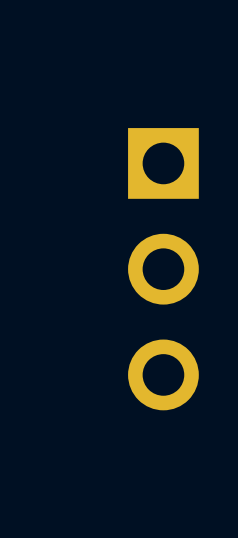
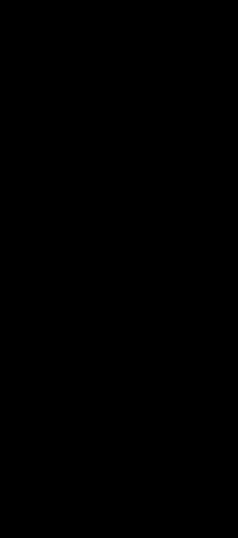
part: (163, 269) -> none

